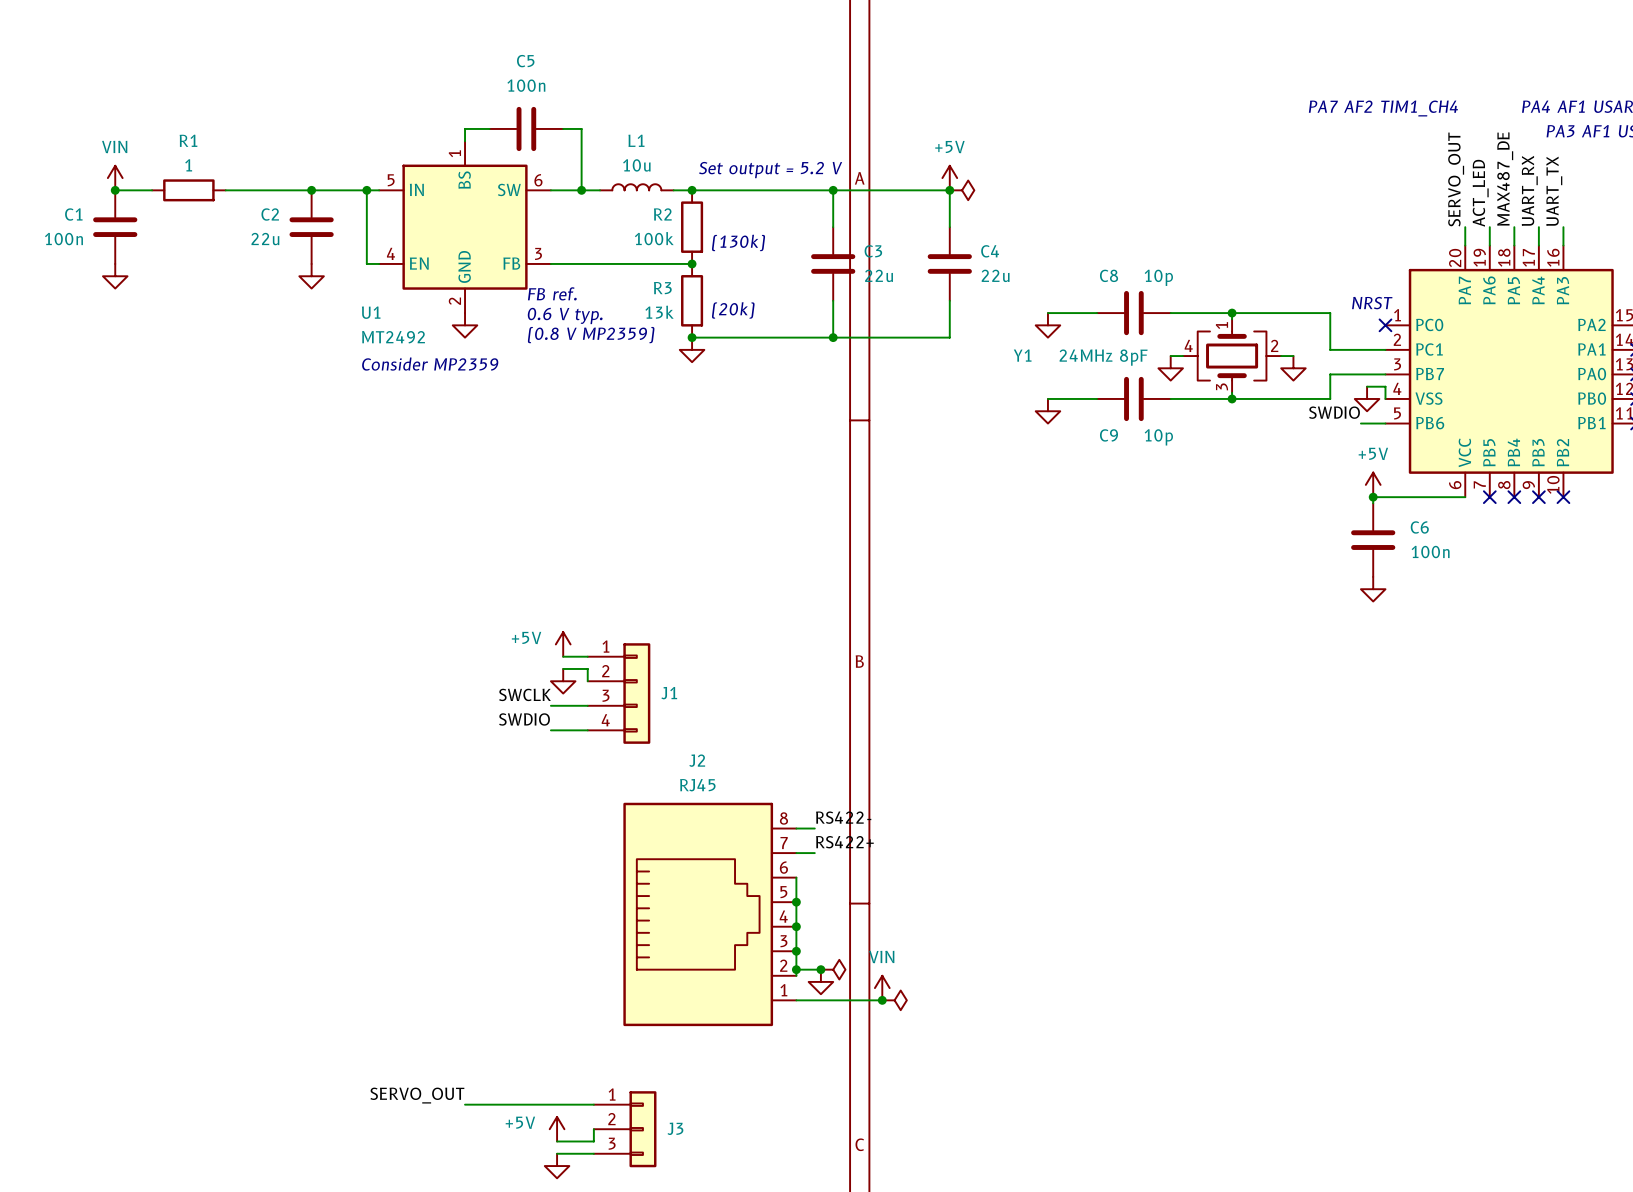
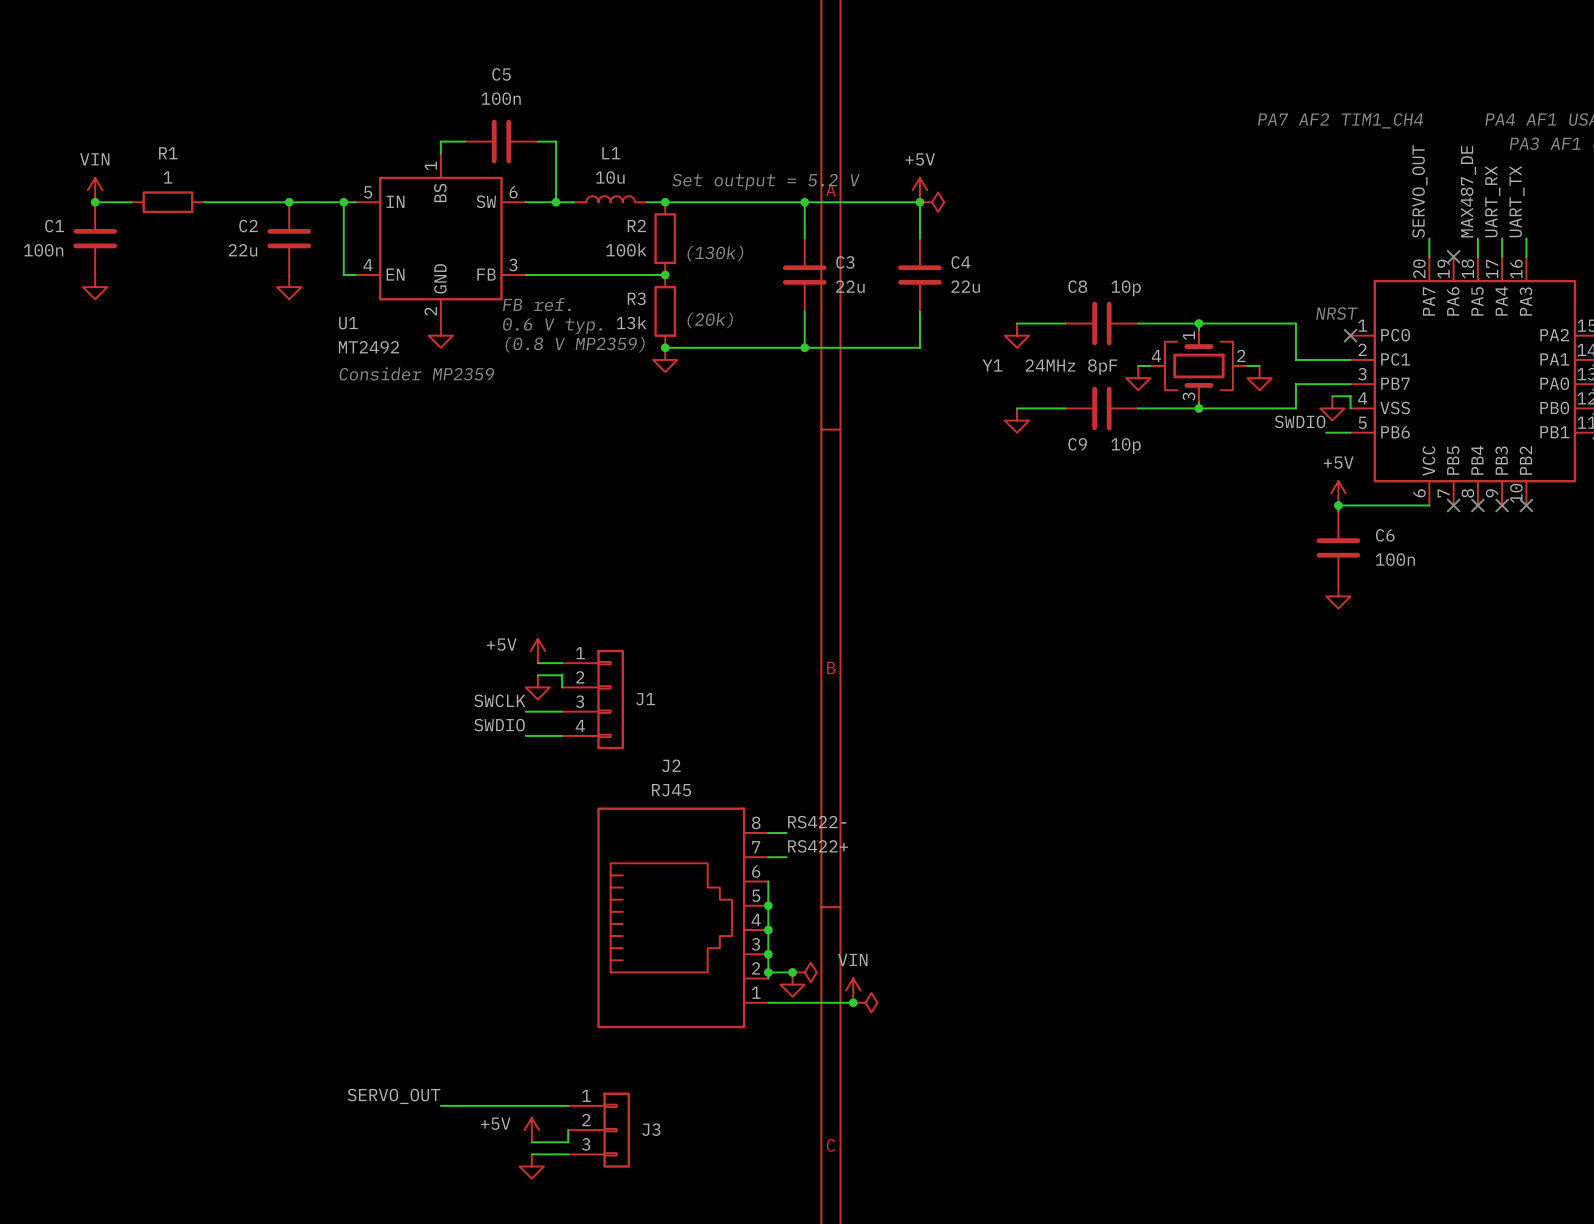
label: ACT_LED (1480, 193) -> none
wire: (1489, 227) (1489, 245) -> none
no-connect mark: none -> (1453, 256)

